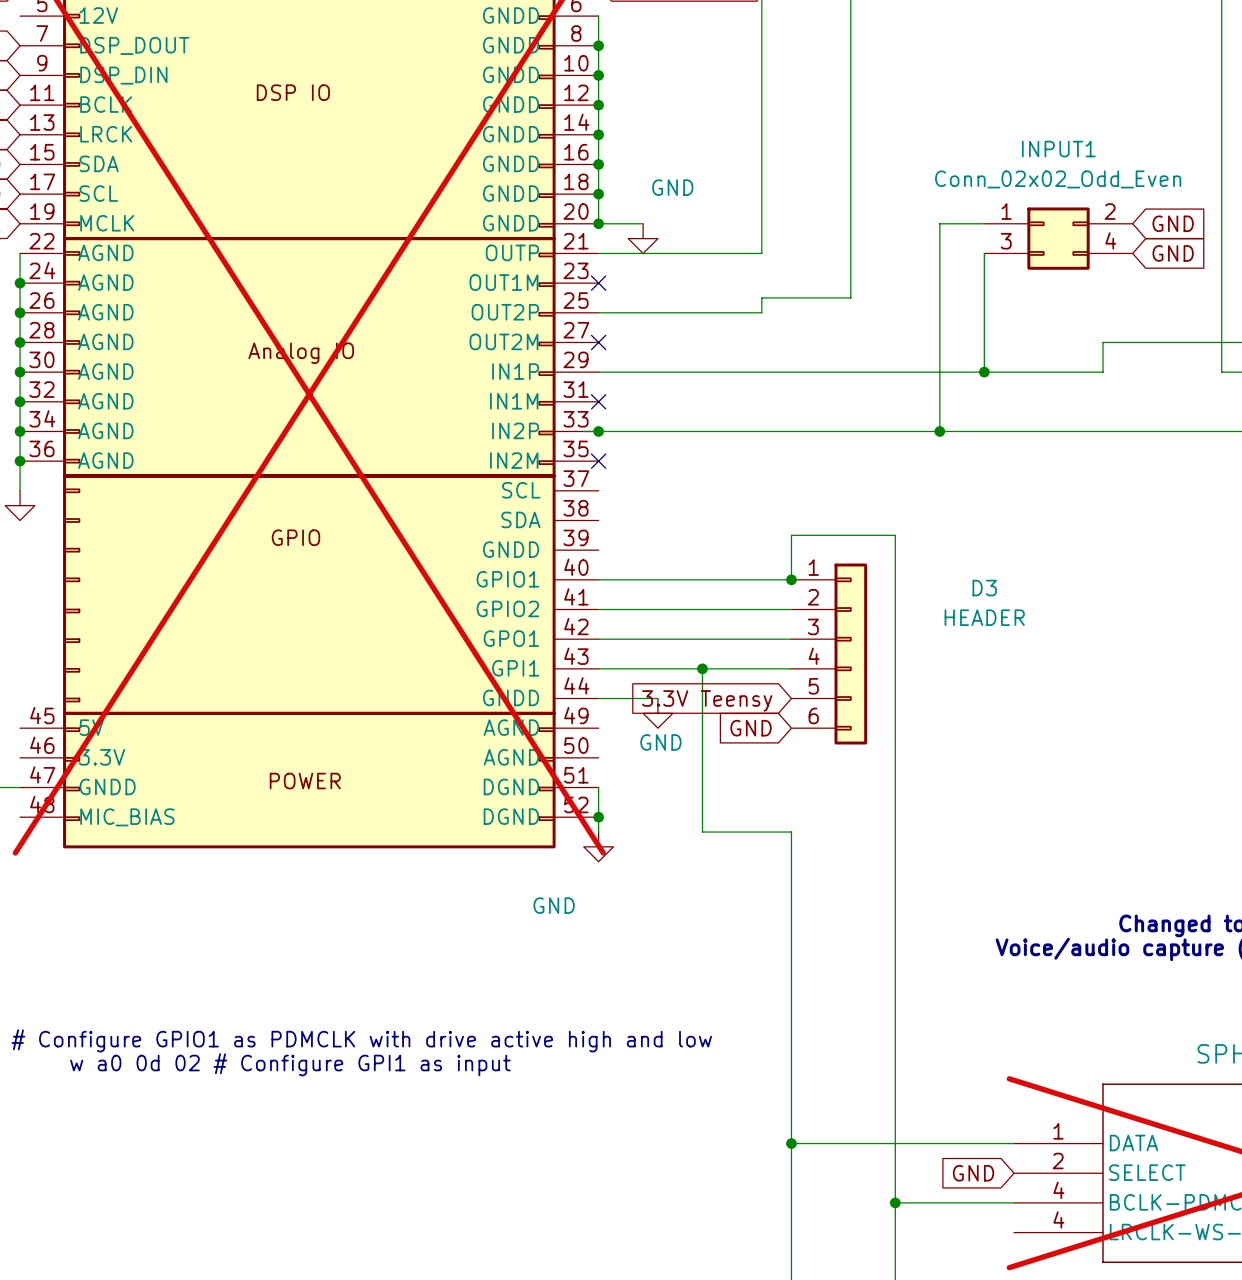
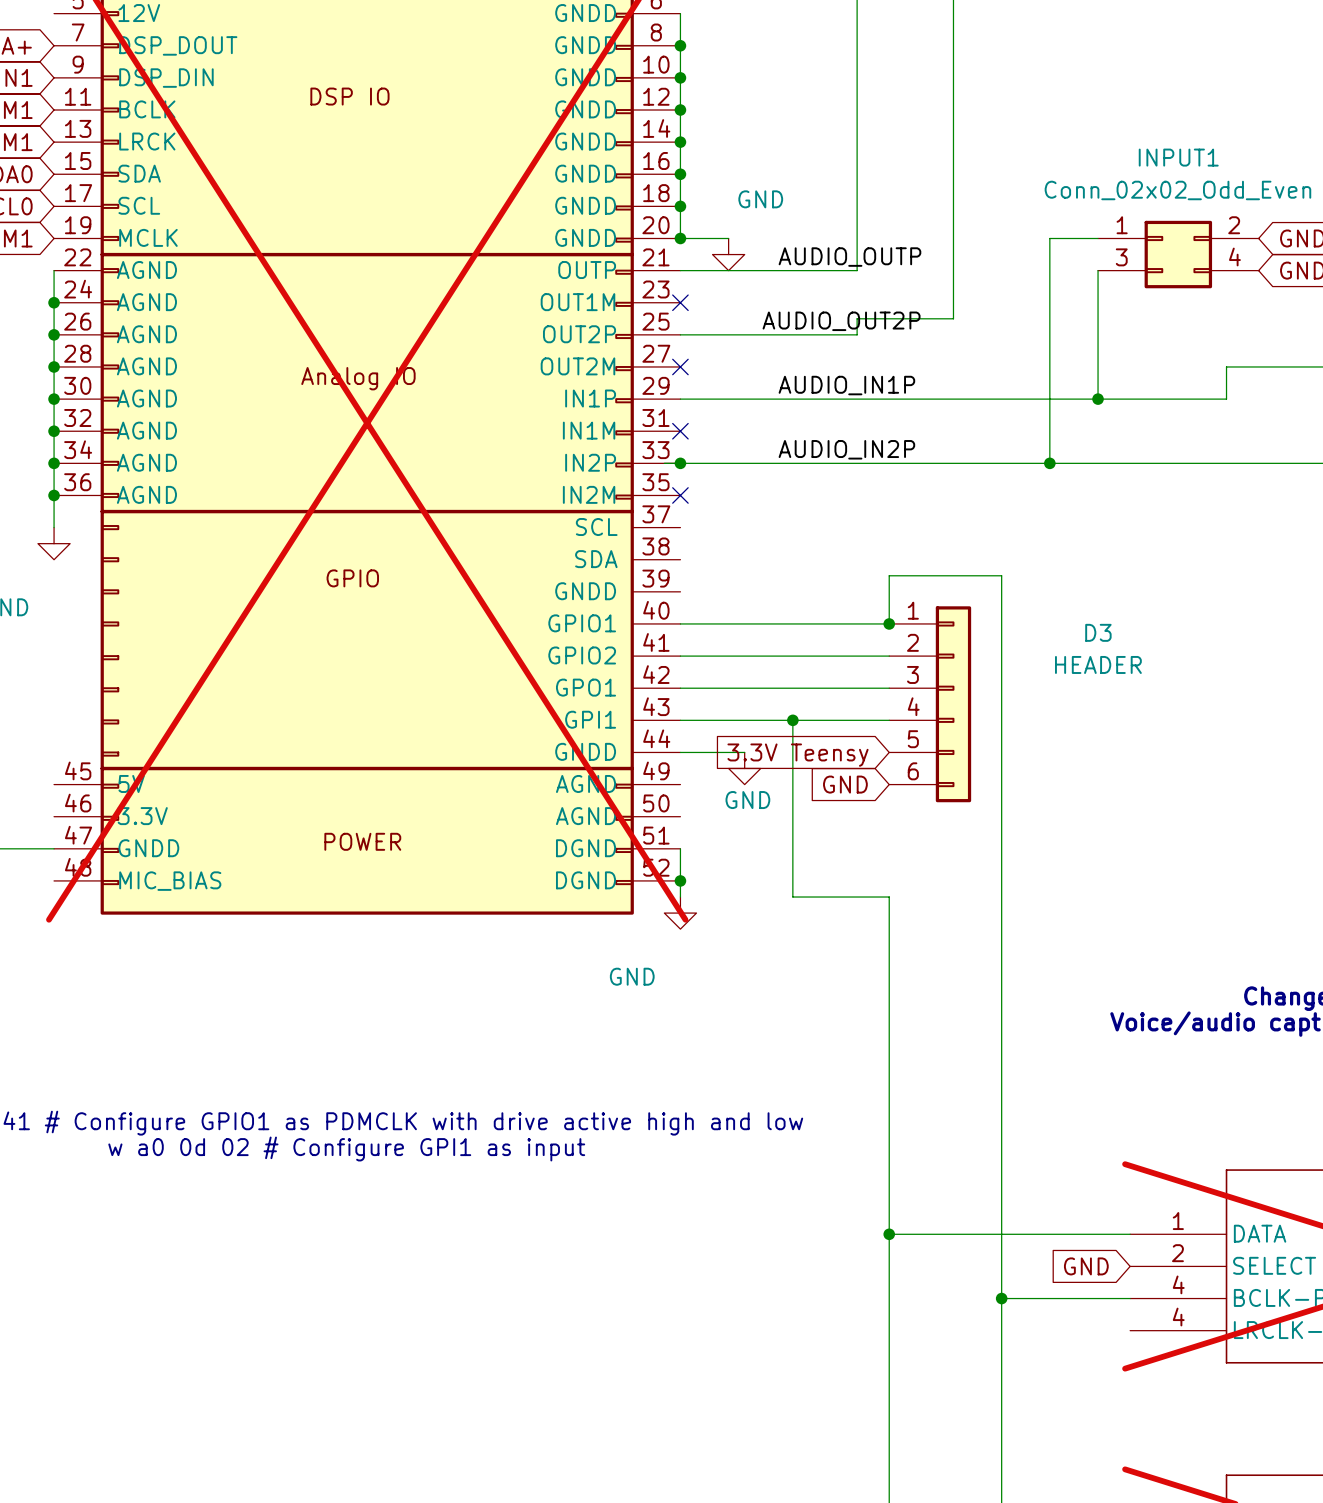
label: none -> AUDIO_OUTP (849, 257)
label: none -> AUDIO_OUT2P (841, 321)
label: none -> AUDIO_IN1P (846, 385)
label: none -> AUDIO_IN2P (846, 449)

